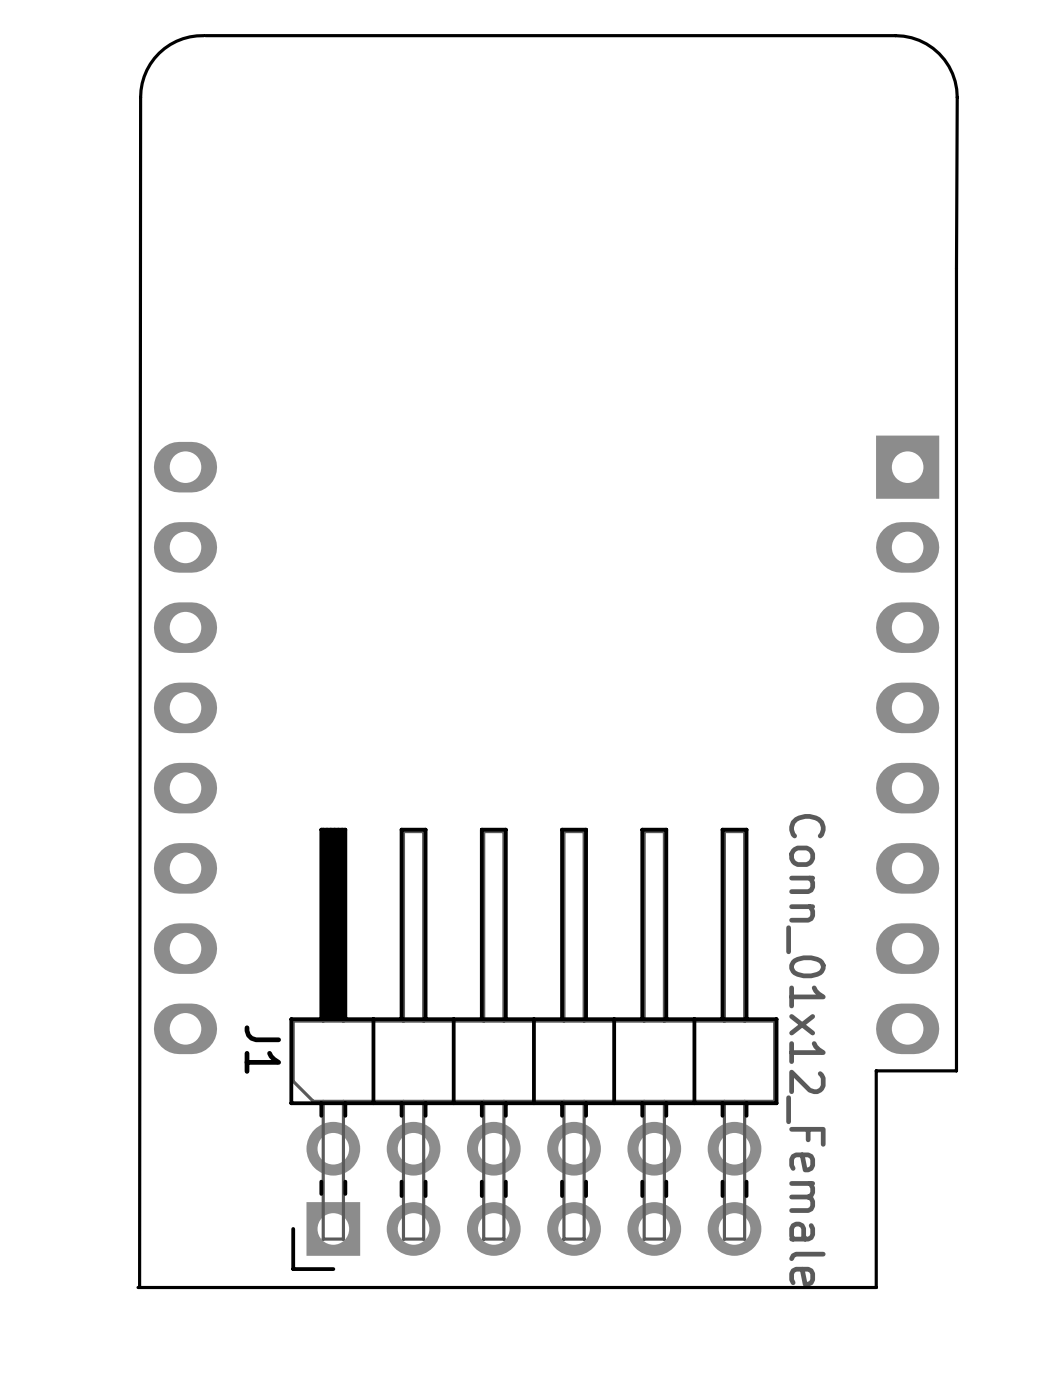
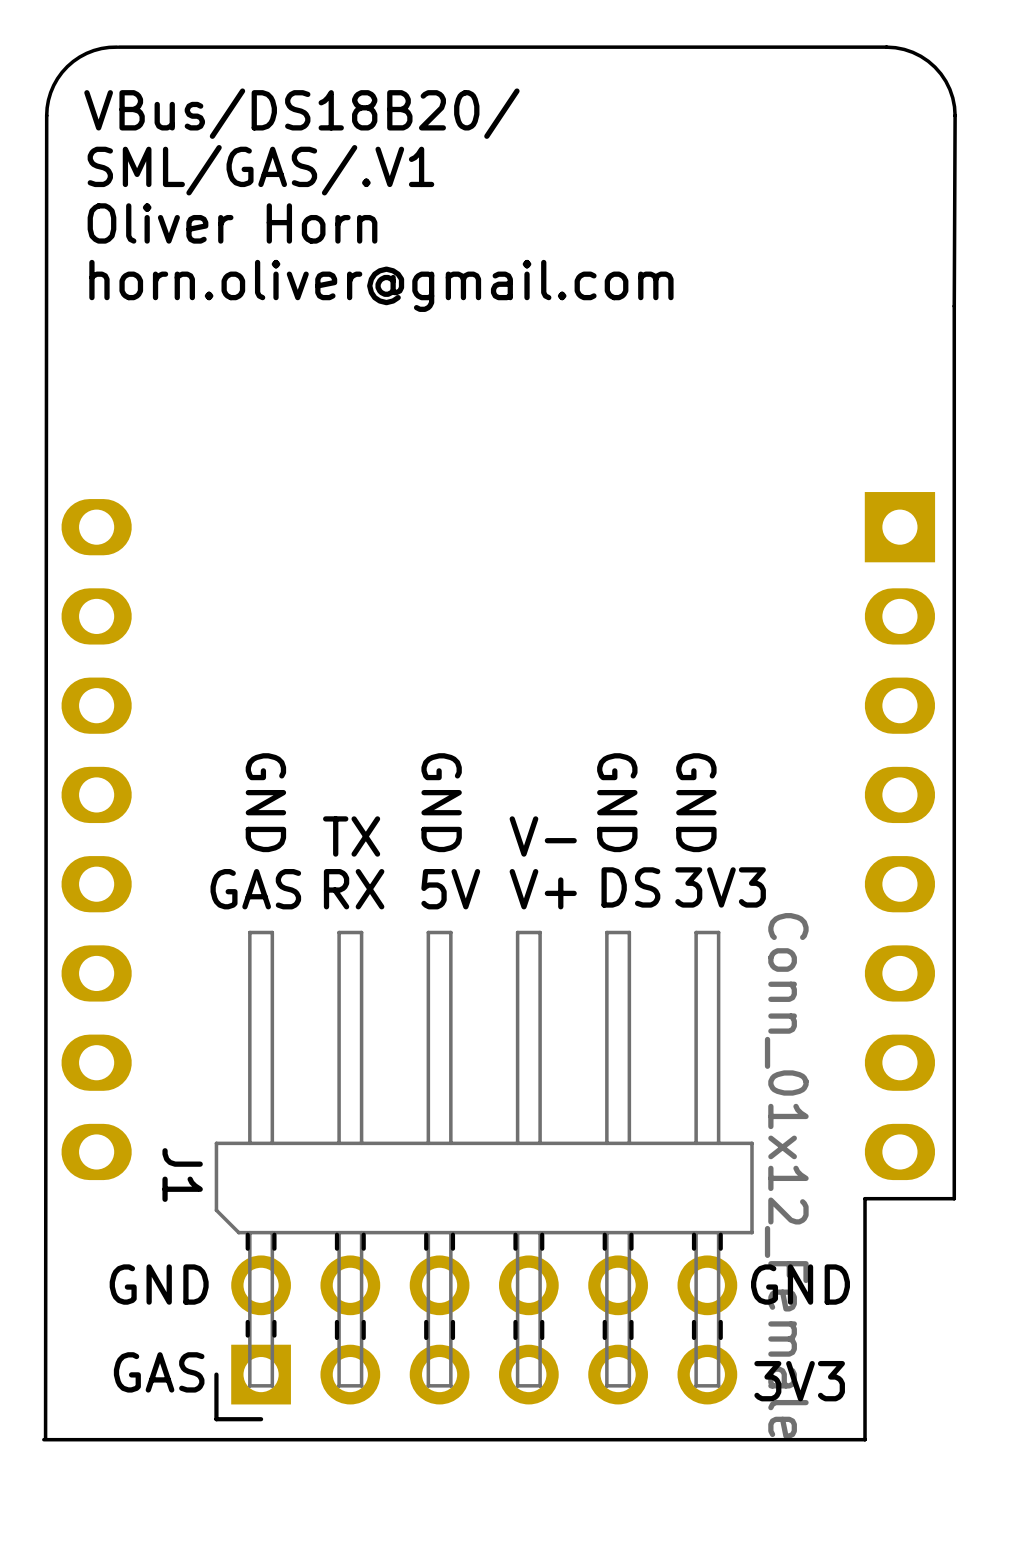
text: none -> VBus/DS18B20/ (301, 113)
text: none -> SML/GAS/.V1 (260, 170)
text: none -> Oliver Horn (232, 223)
text: none -> horn.oliver@gmail.com (381, 285)
text: none -> GND (265, 802)
text: none -> GND (441, 802)
text: none -> GND (617, 802)
text: none -> GND (696, 802)
text: none -> TX (351, 836)
text: none -> V- (543, 836)
text: none -> DS (630, 887)
text: none -> 3V3 (720, 887)
text: none -> GAS (255, 889)
text: none -> RX (354, 889)
text: none -> 5V (450, 889)
text: none -> V+ (543, 889)
J1 footprint: [289, 827, 779, 1271] -> [214, 930, 754, 1422]
text: none -> GND (159, 1284)
text: none -> GND (800, 1284)
text: none -> GAS (159, 1372)
text: none -> 3V3 (799, 1381)

